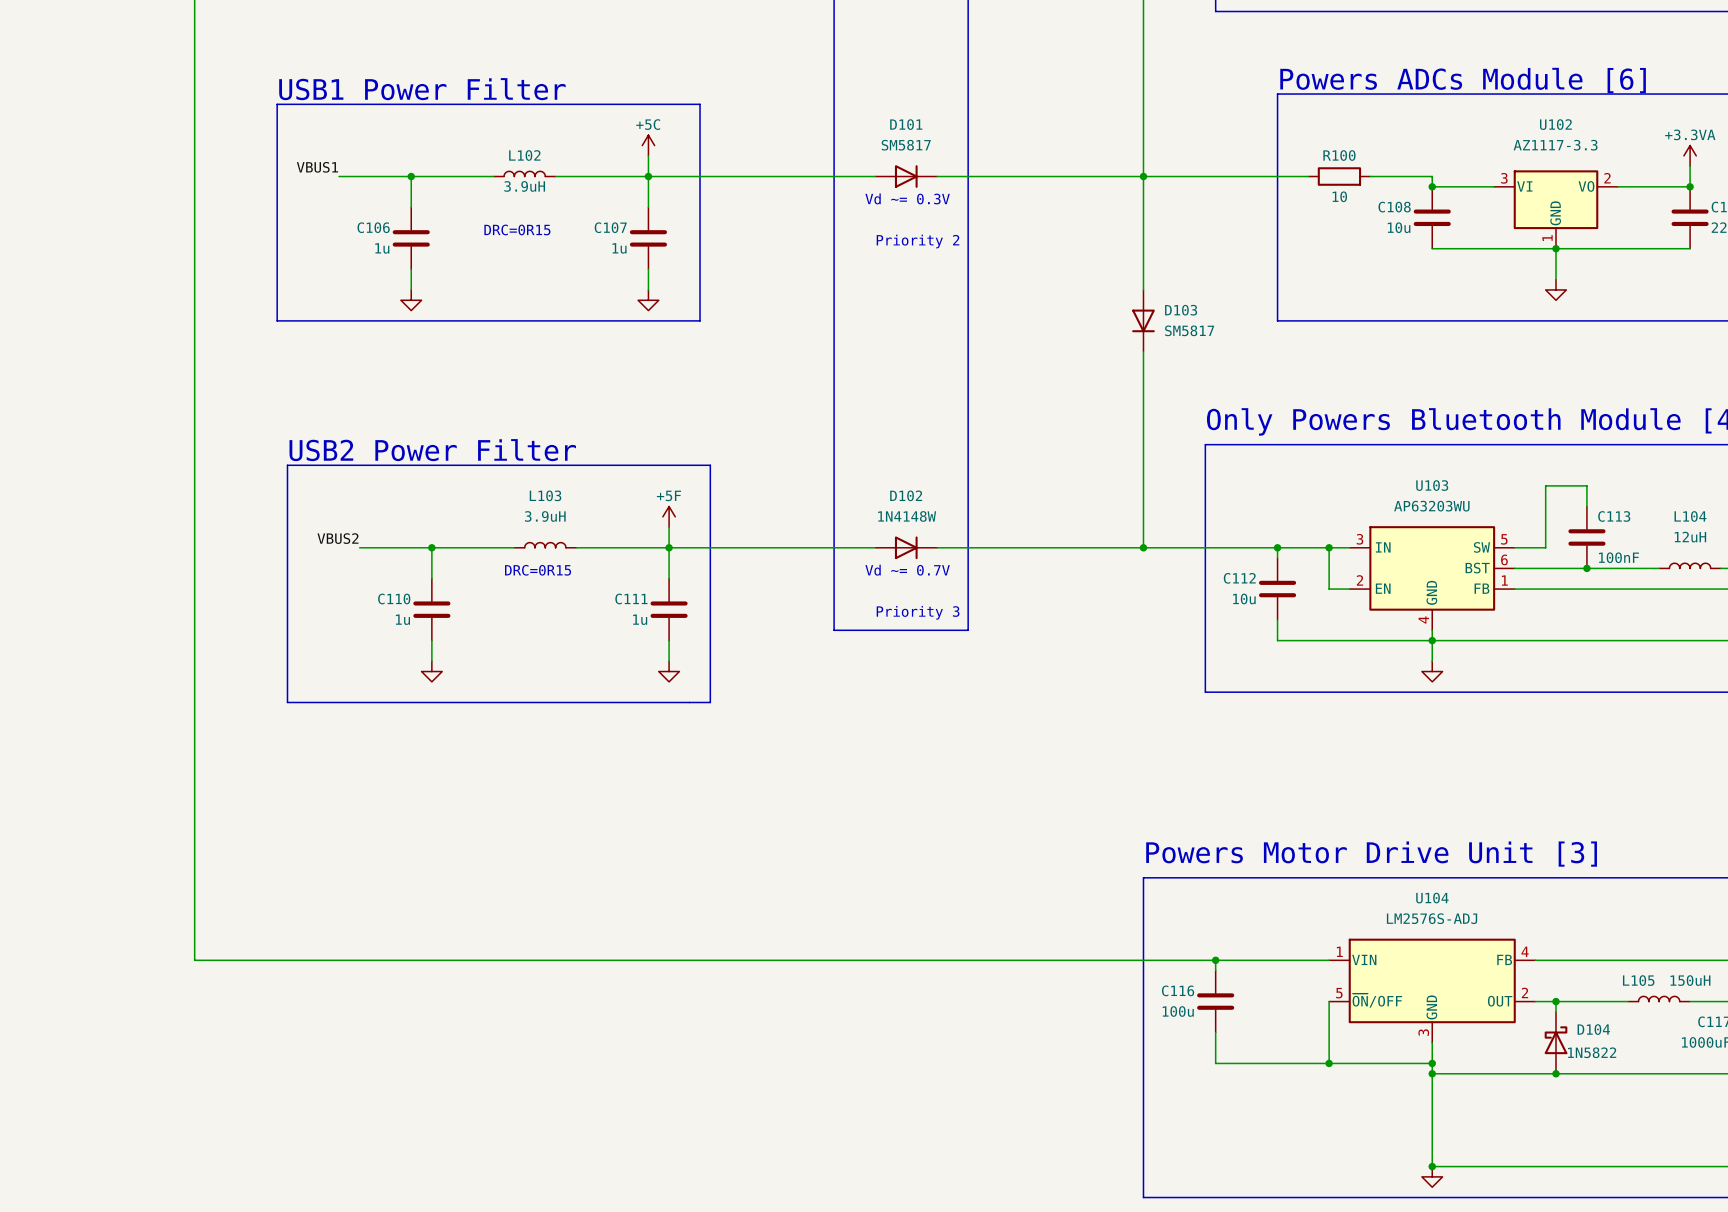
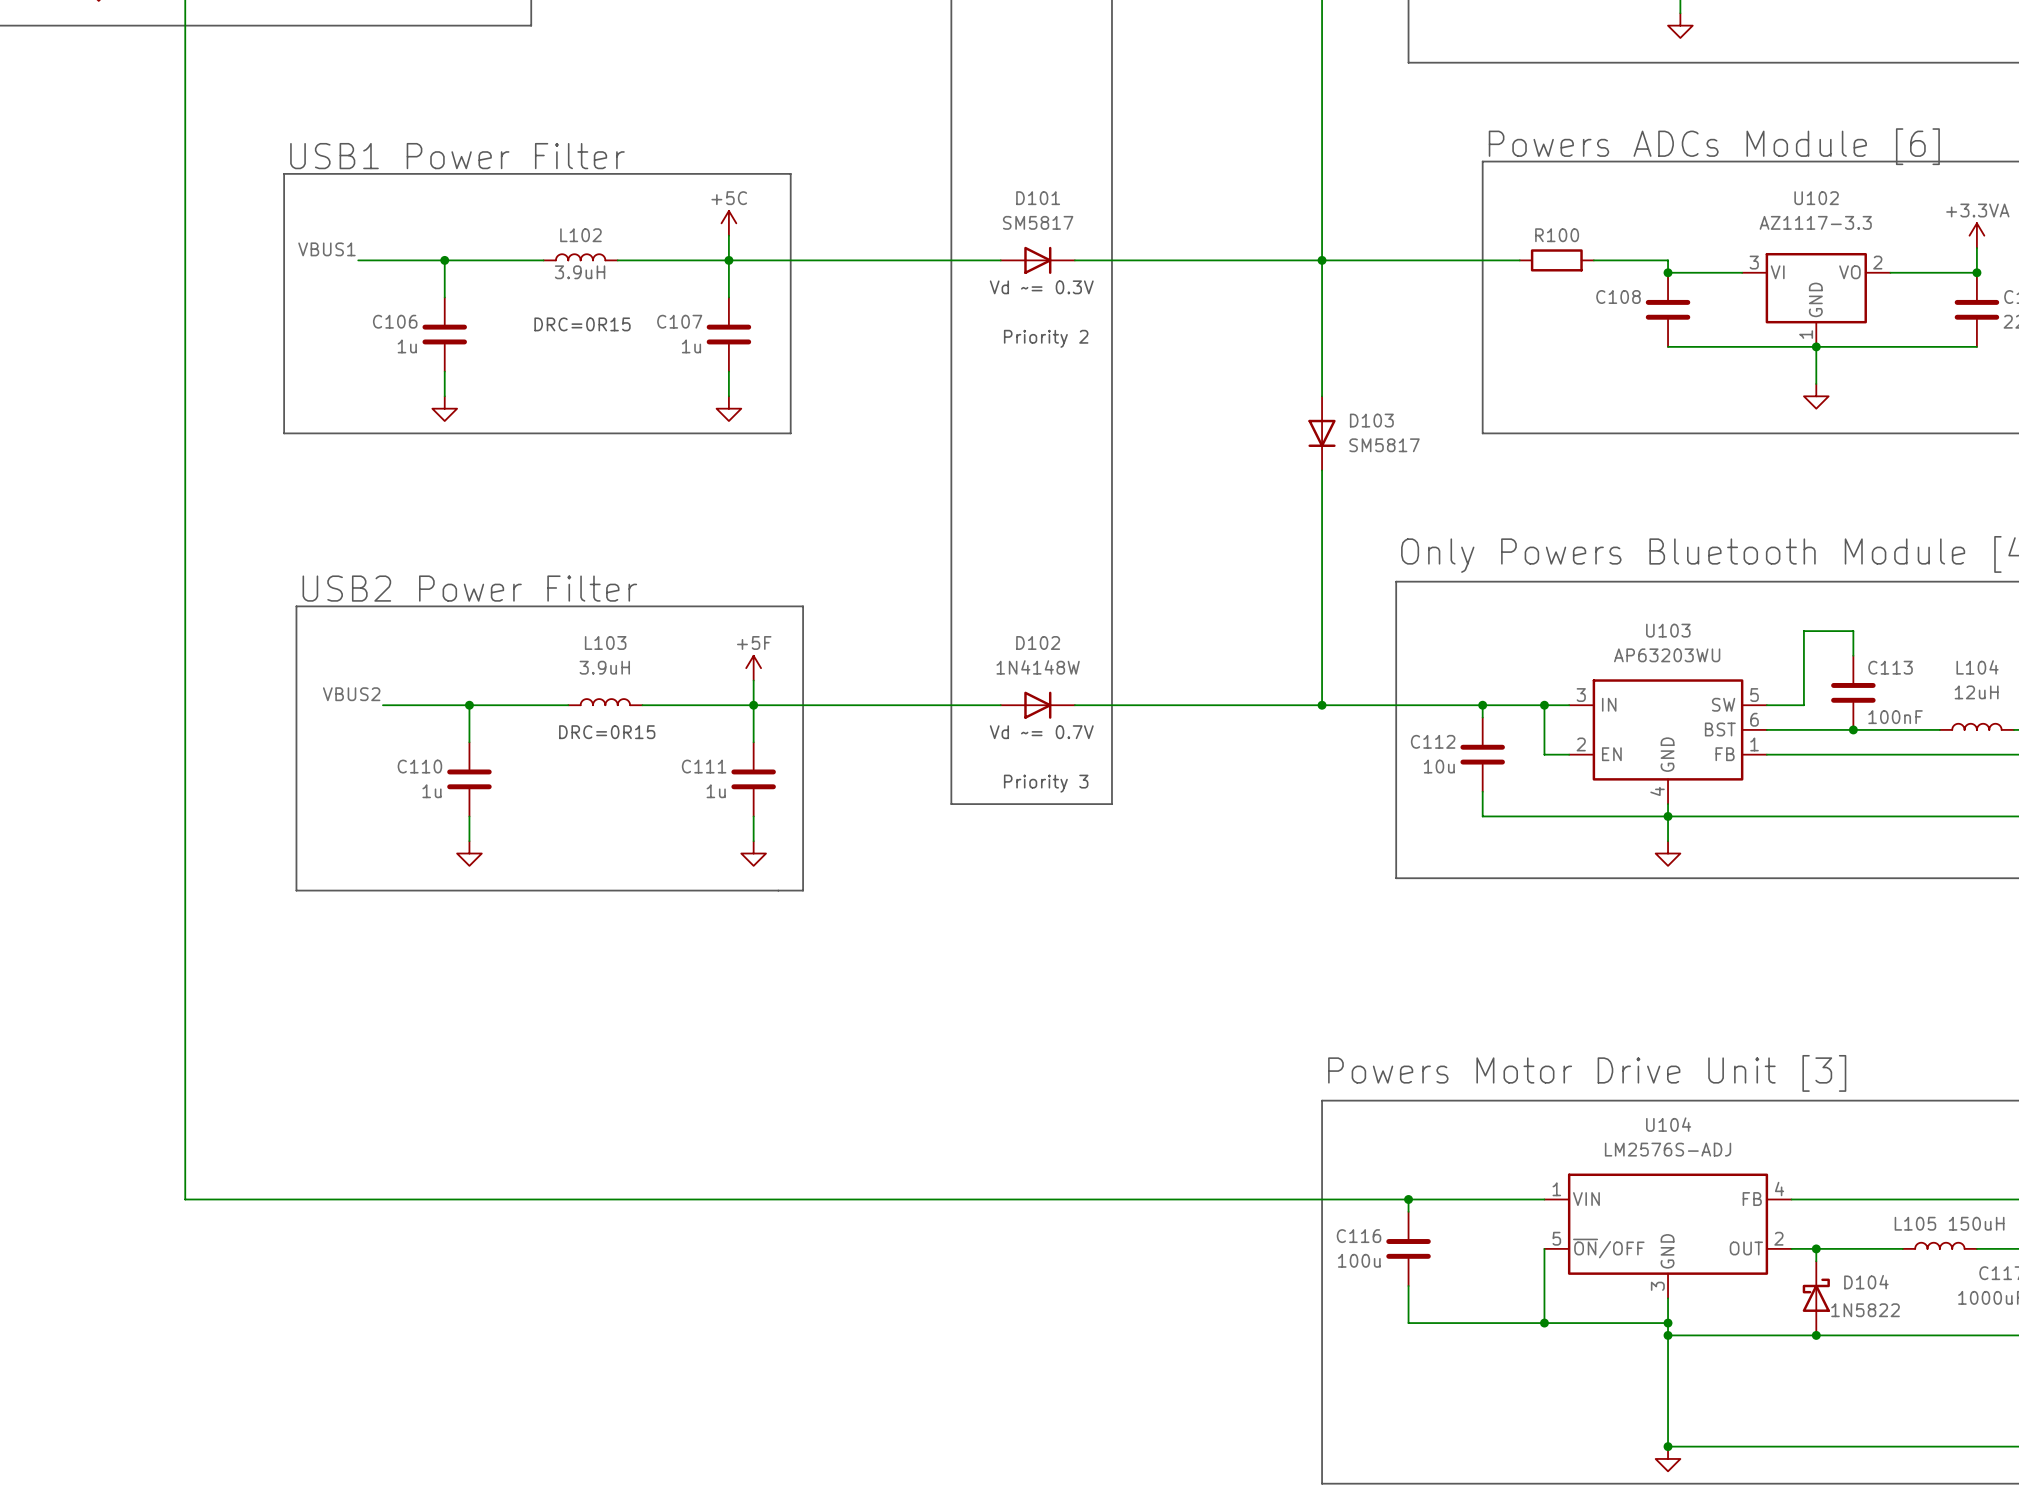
R100 value: 10 (1339, 196) -> none
C108 value: 10u (1399, 227) -> none

